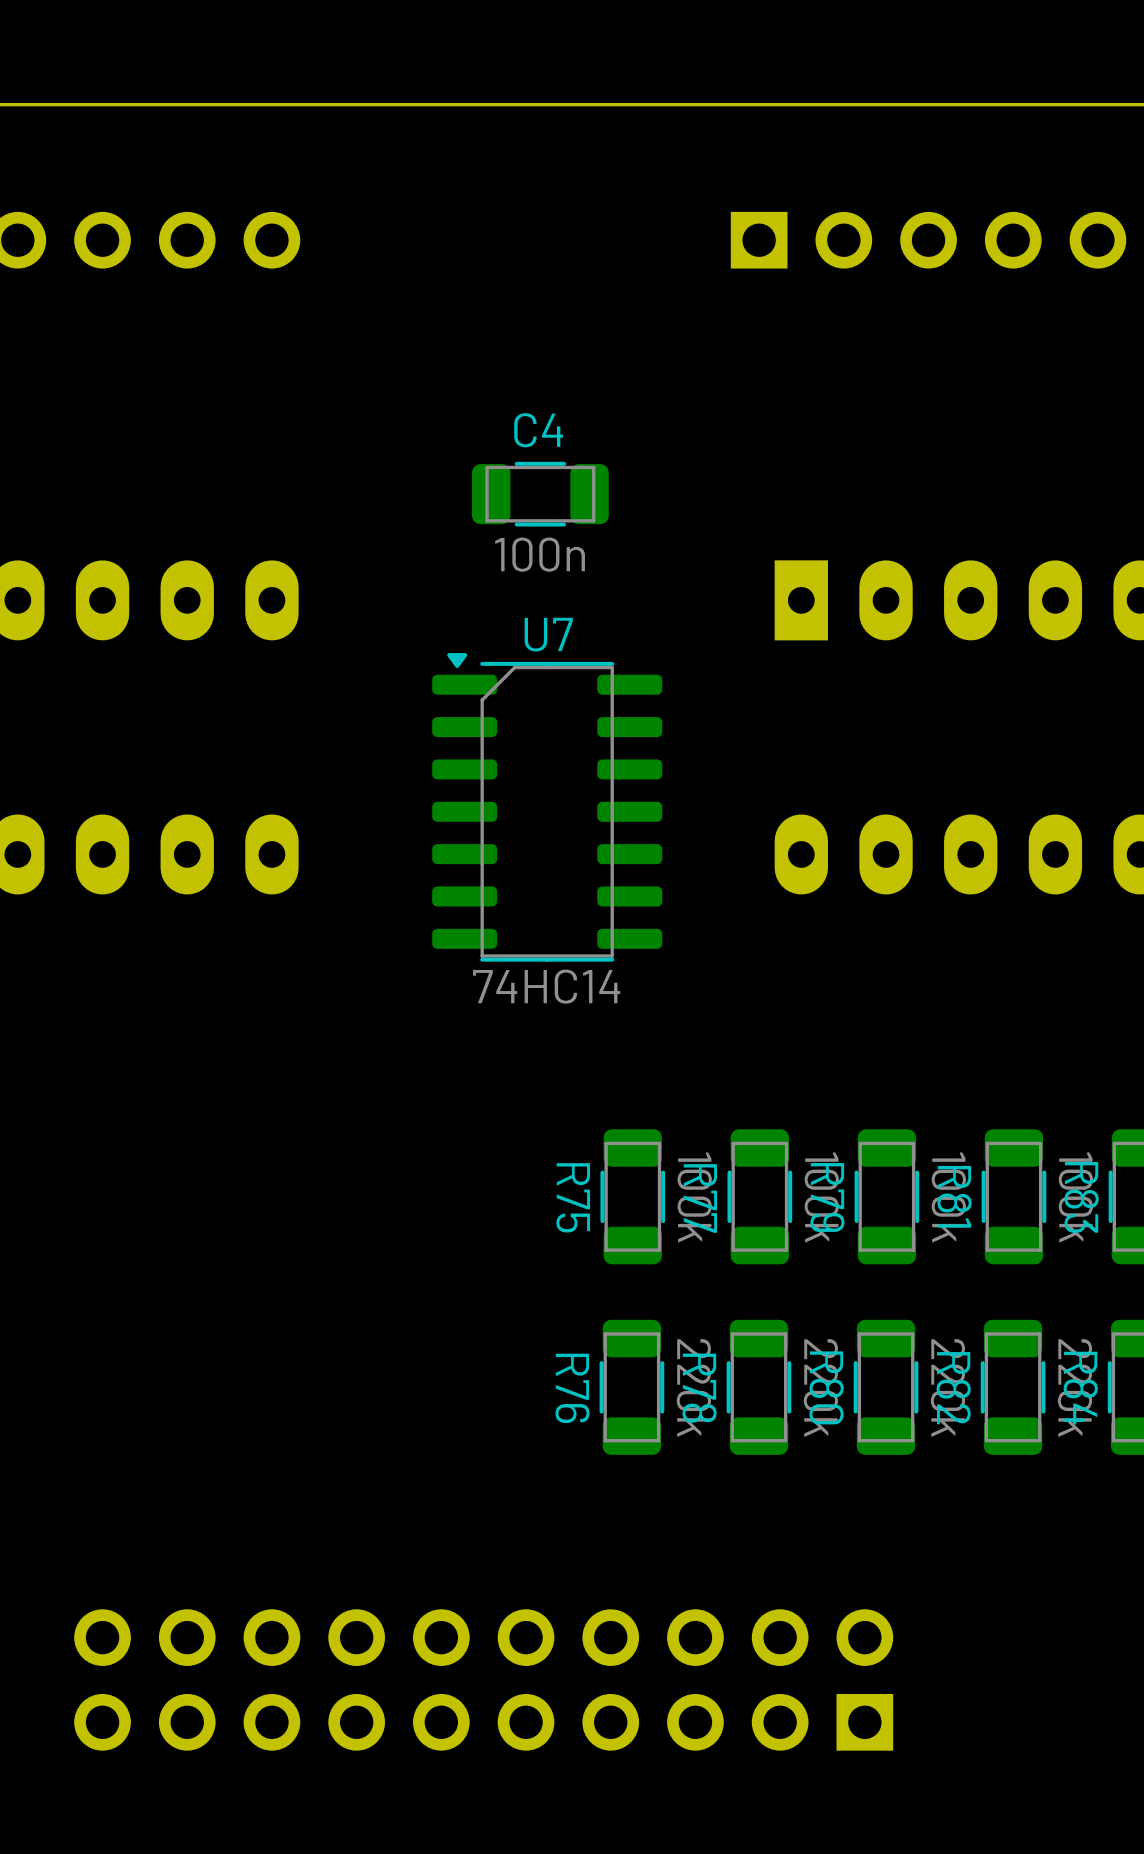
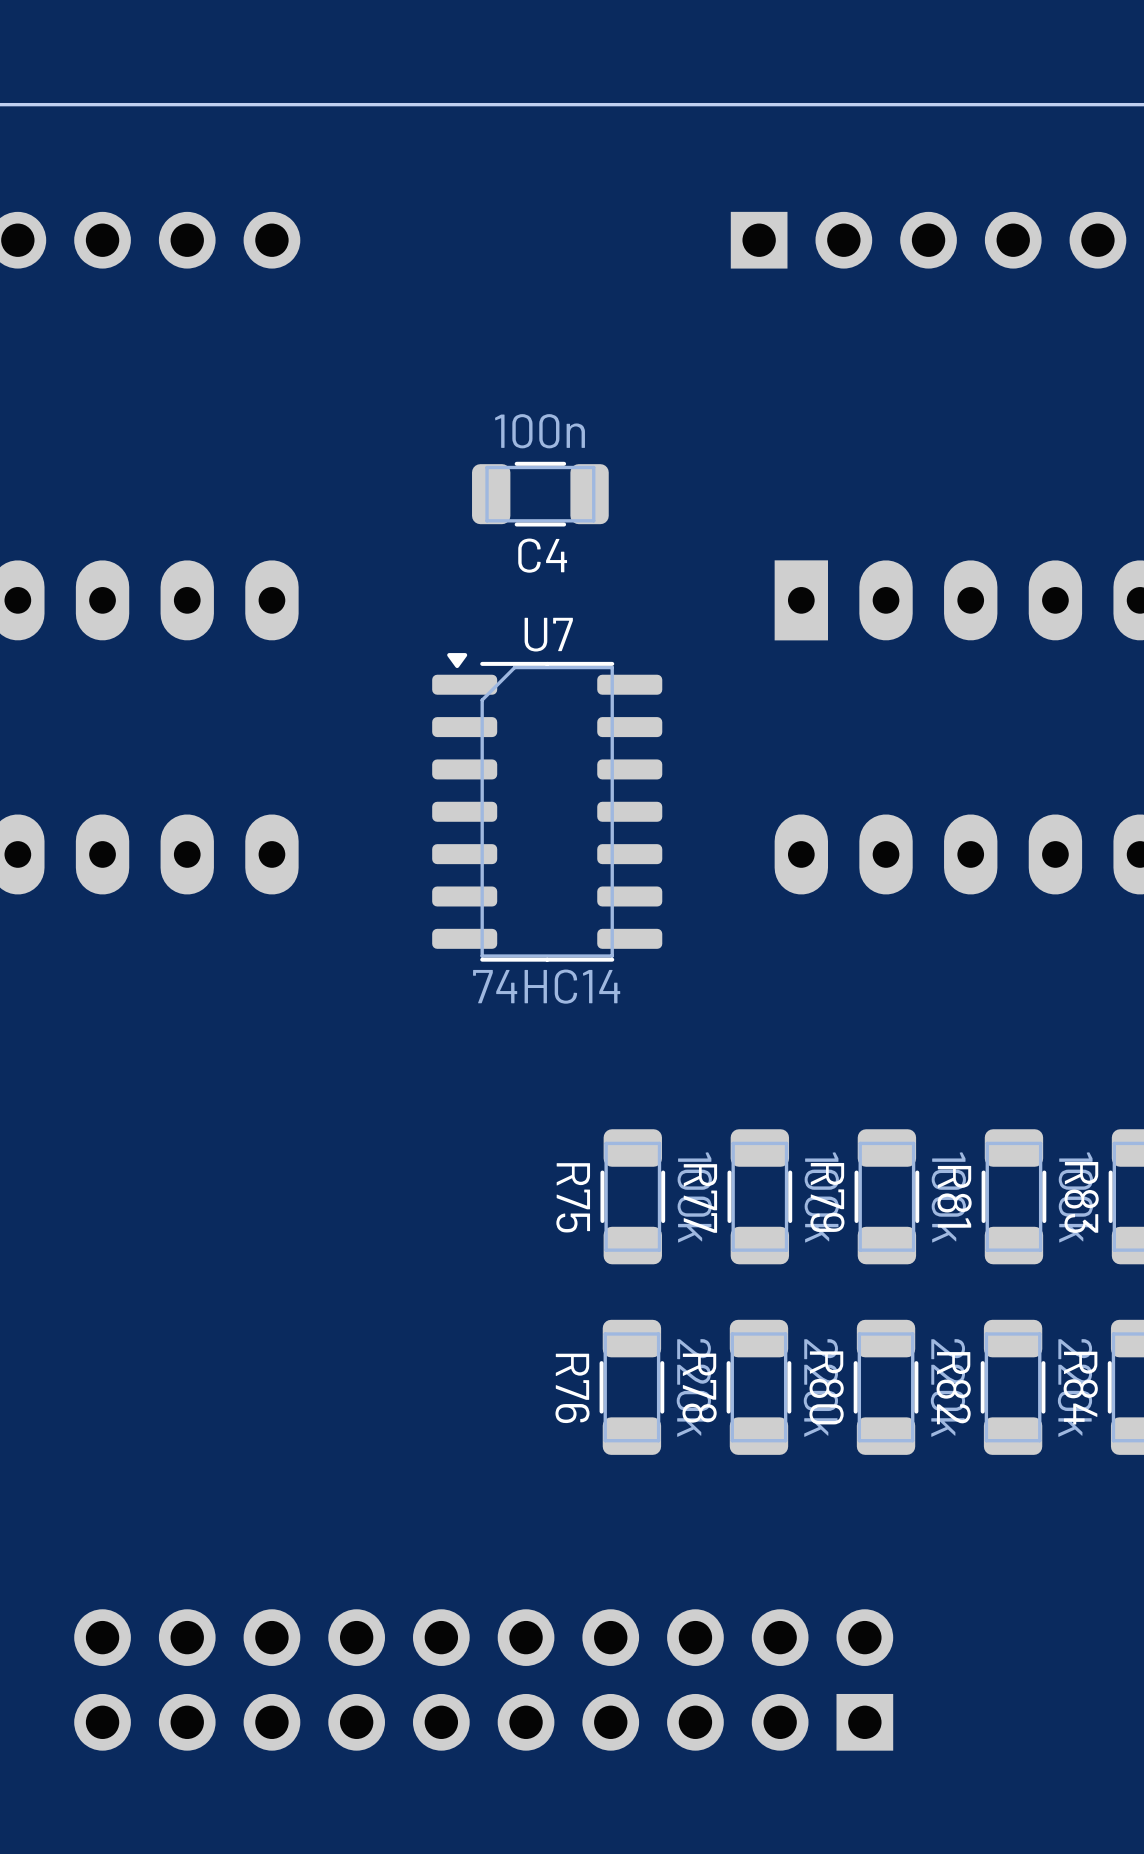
C4 name position: C4 (538, 430) -> C4 (542, 555)
C4 value position: 100n (540, 554) -> 100n (540, 431)

